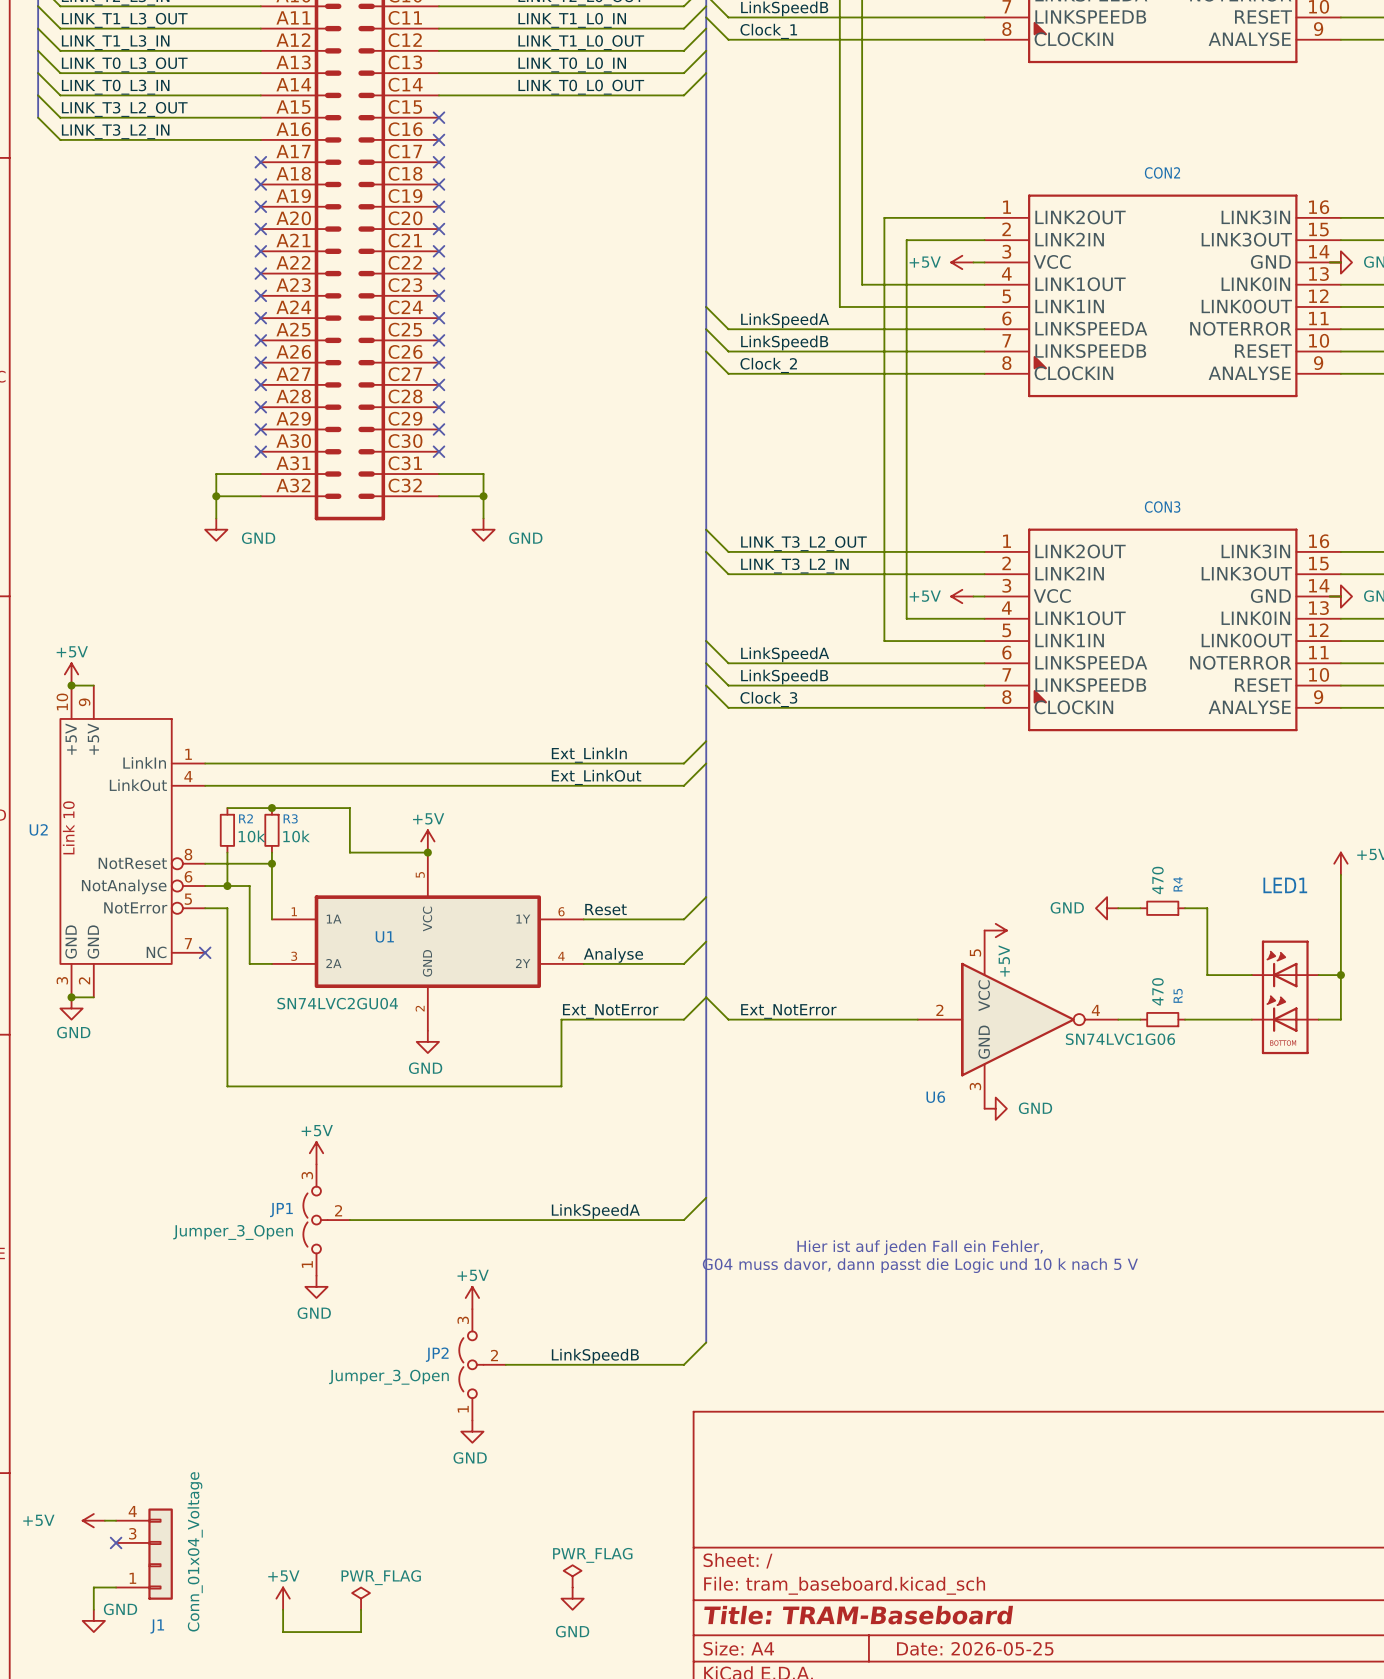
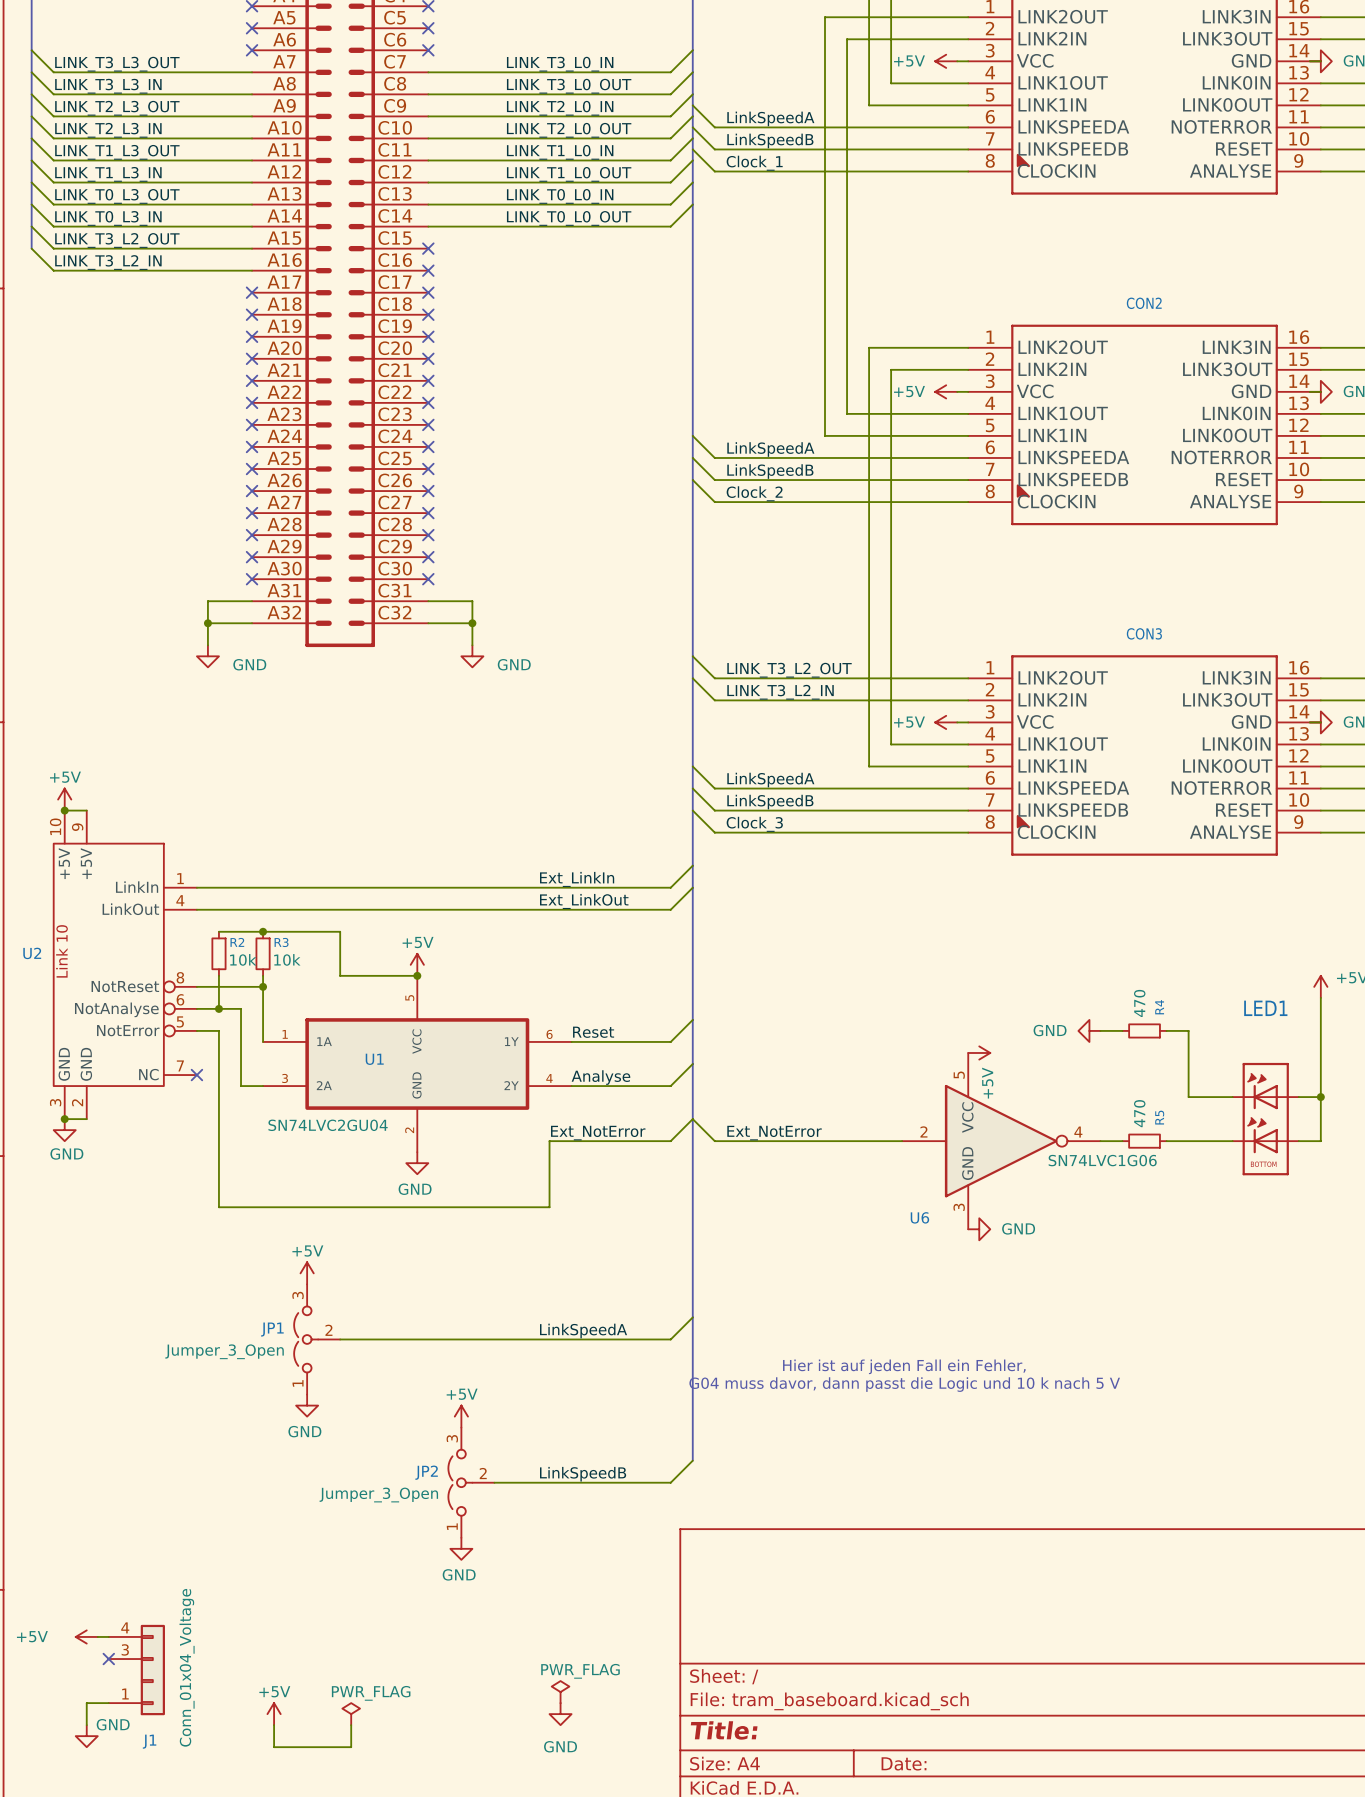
title block: Title: TRAM-Baseboard (858, 1615) -> Title: (724, 1730)
title block: Date: 2026-05-25 (975, 1648) -> Date: (904, 1763)

